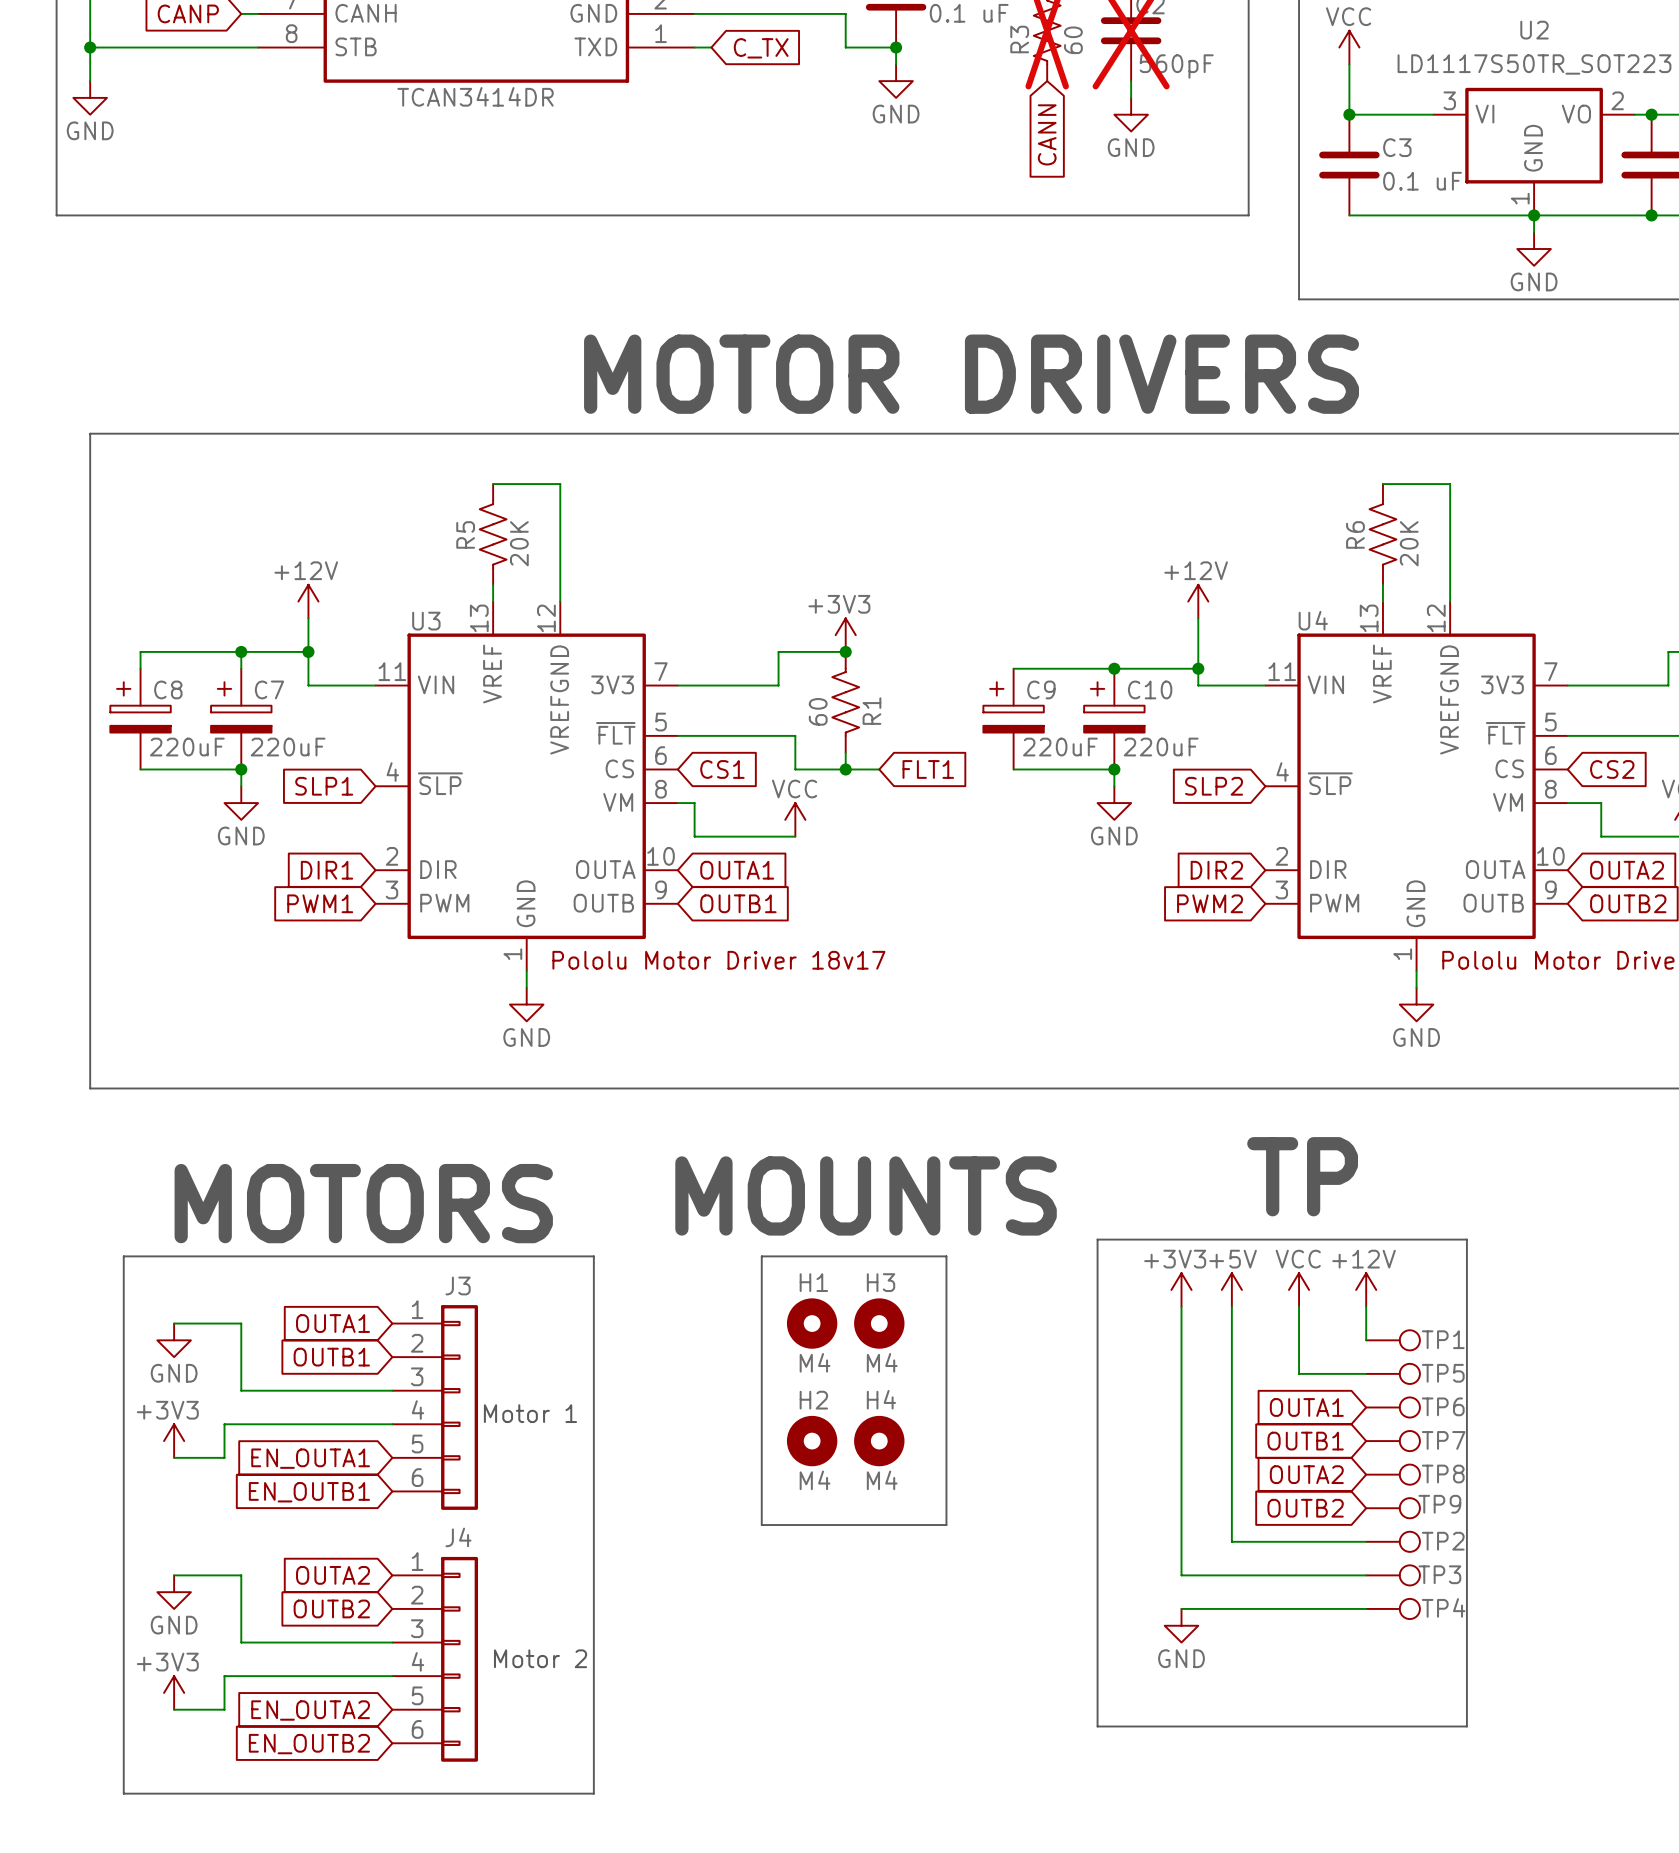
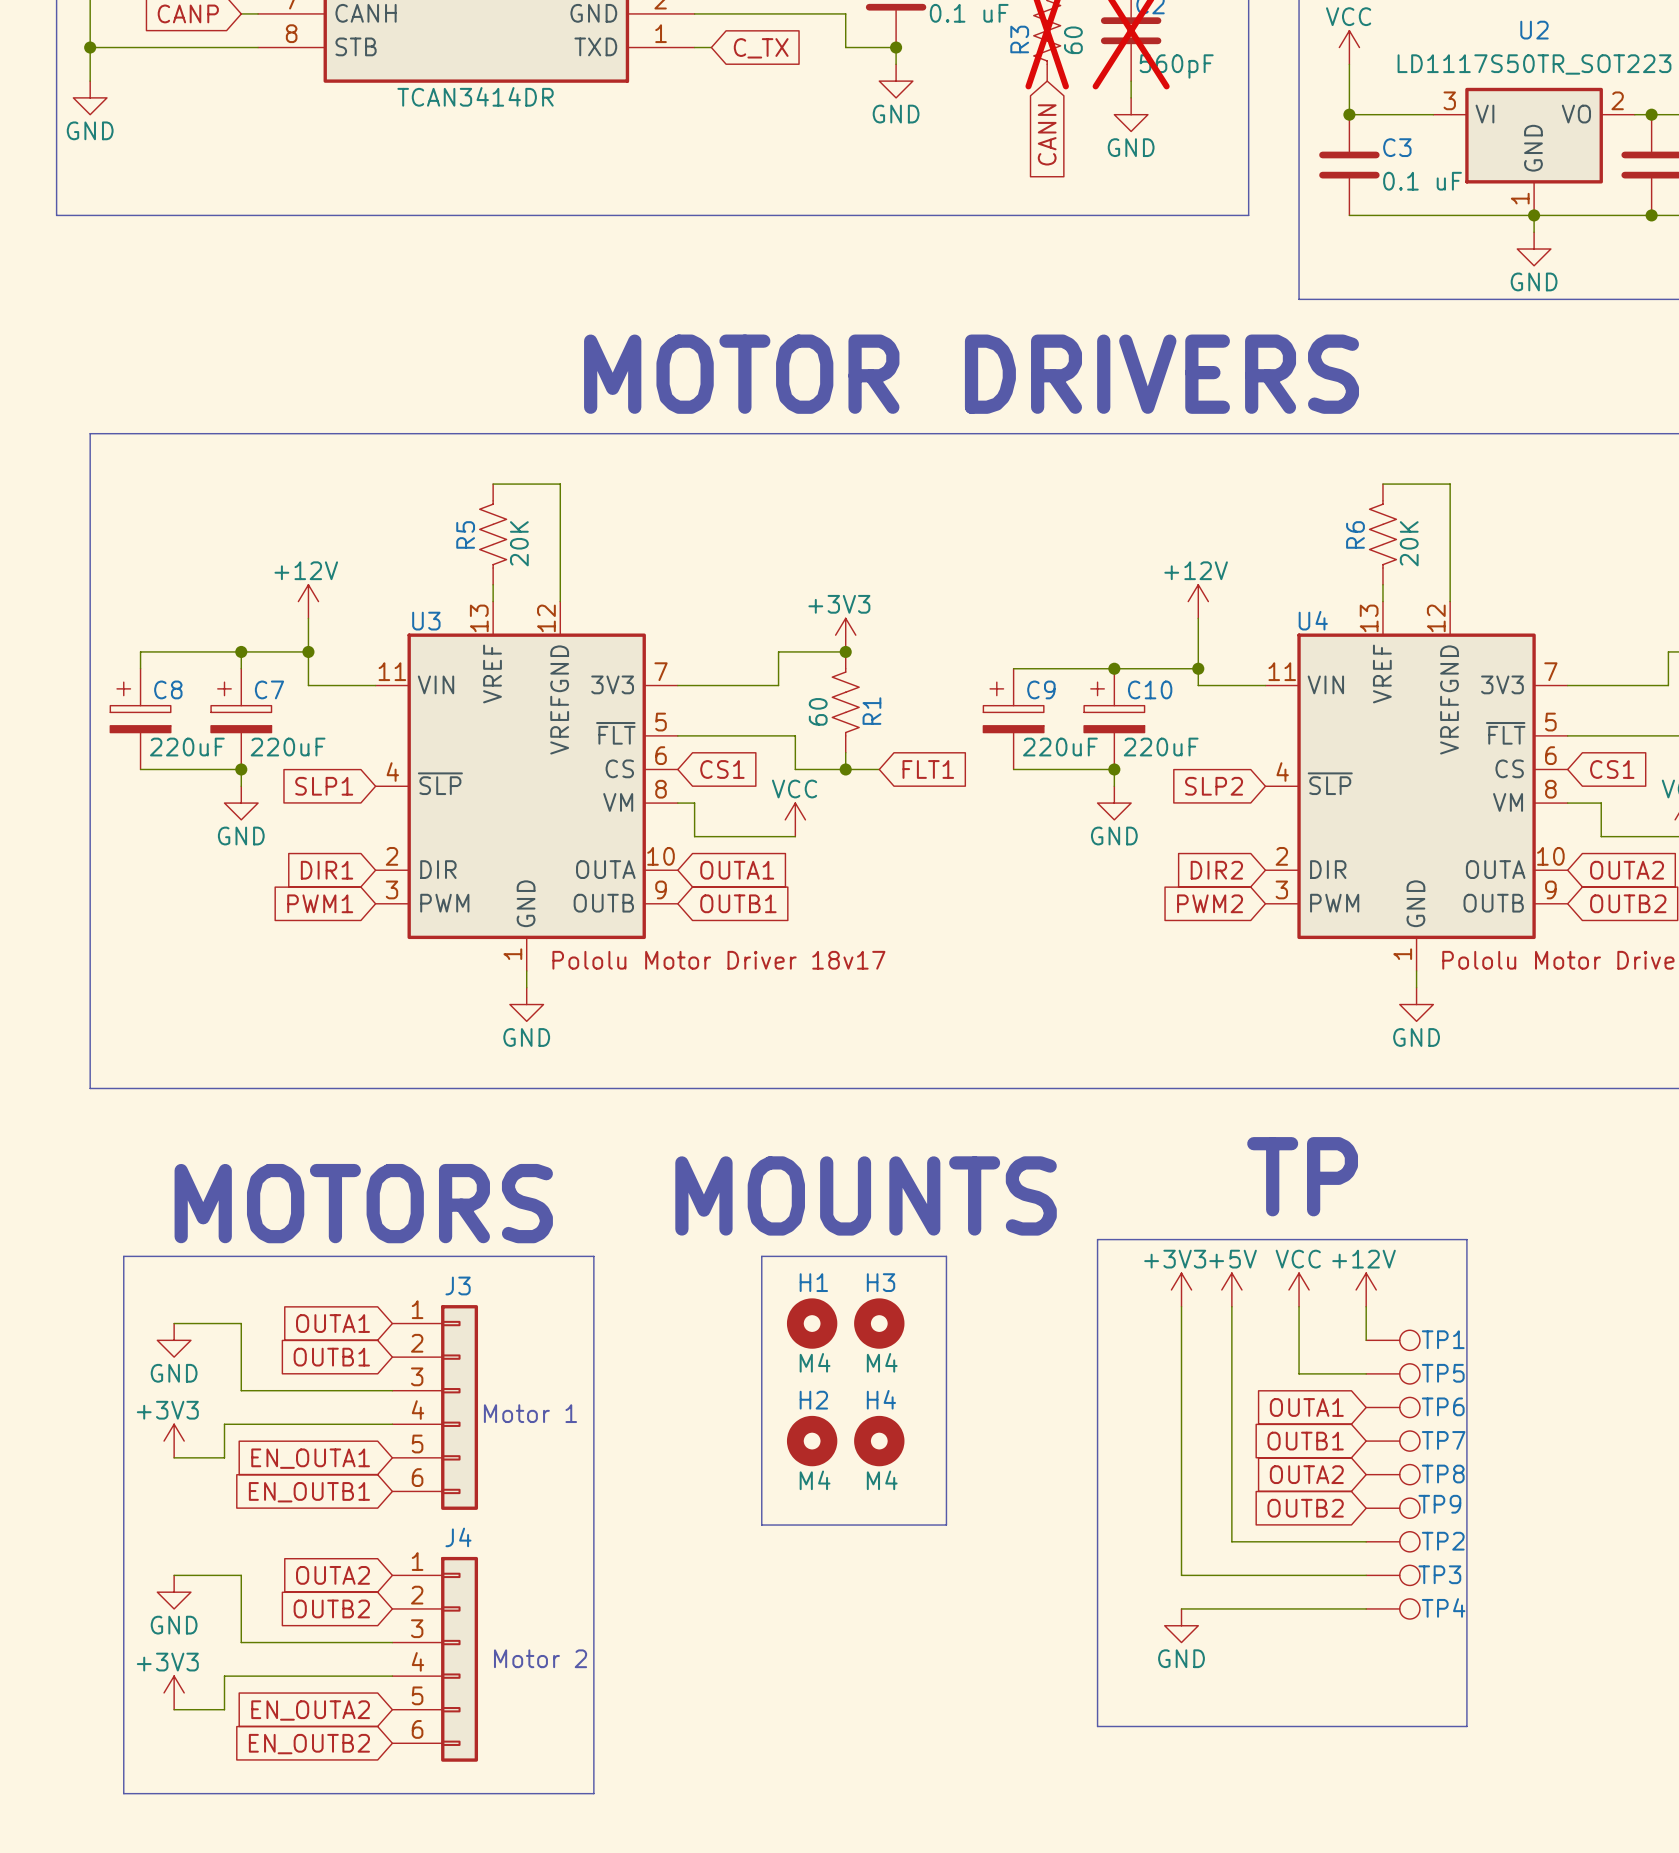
global label: CS2 (1612, 769) -> CS1 (1612, 769)

